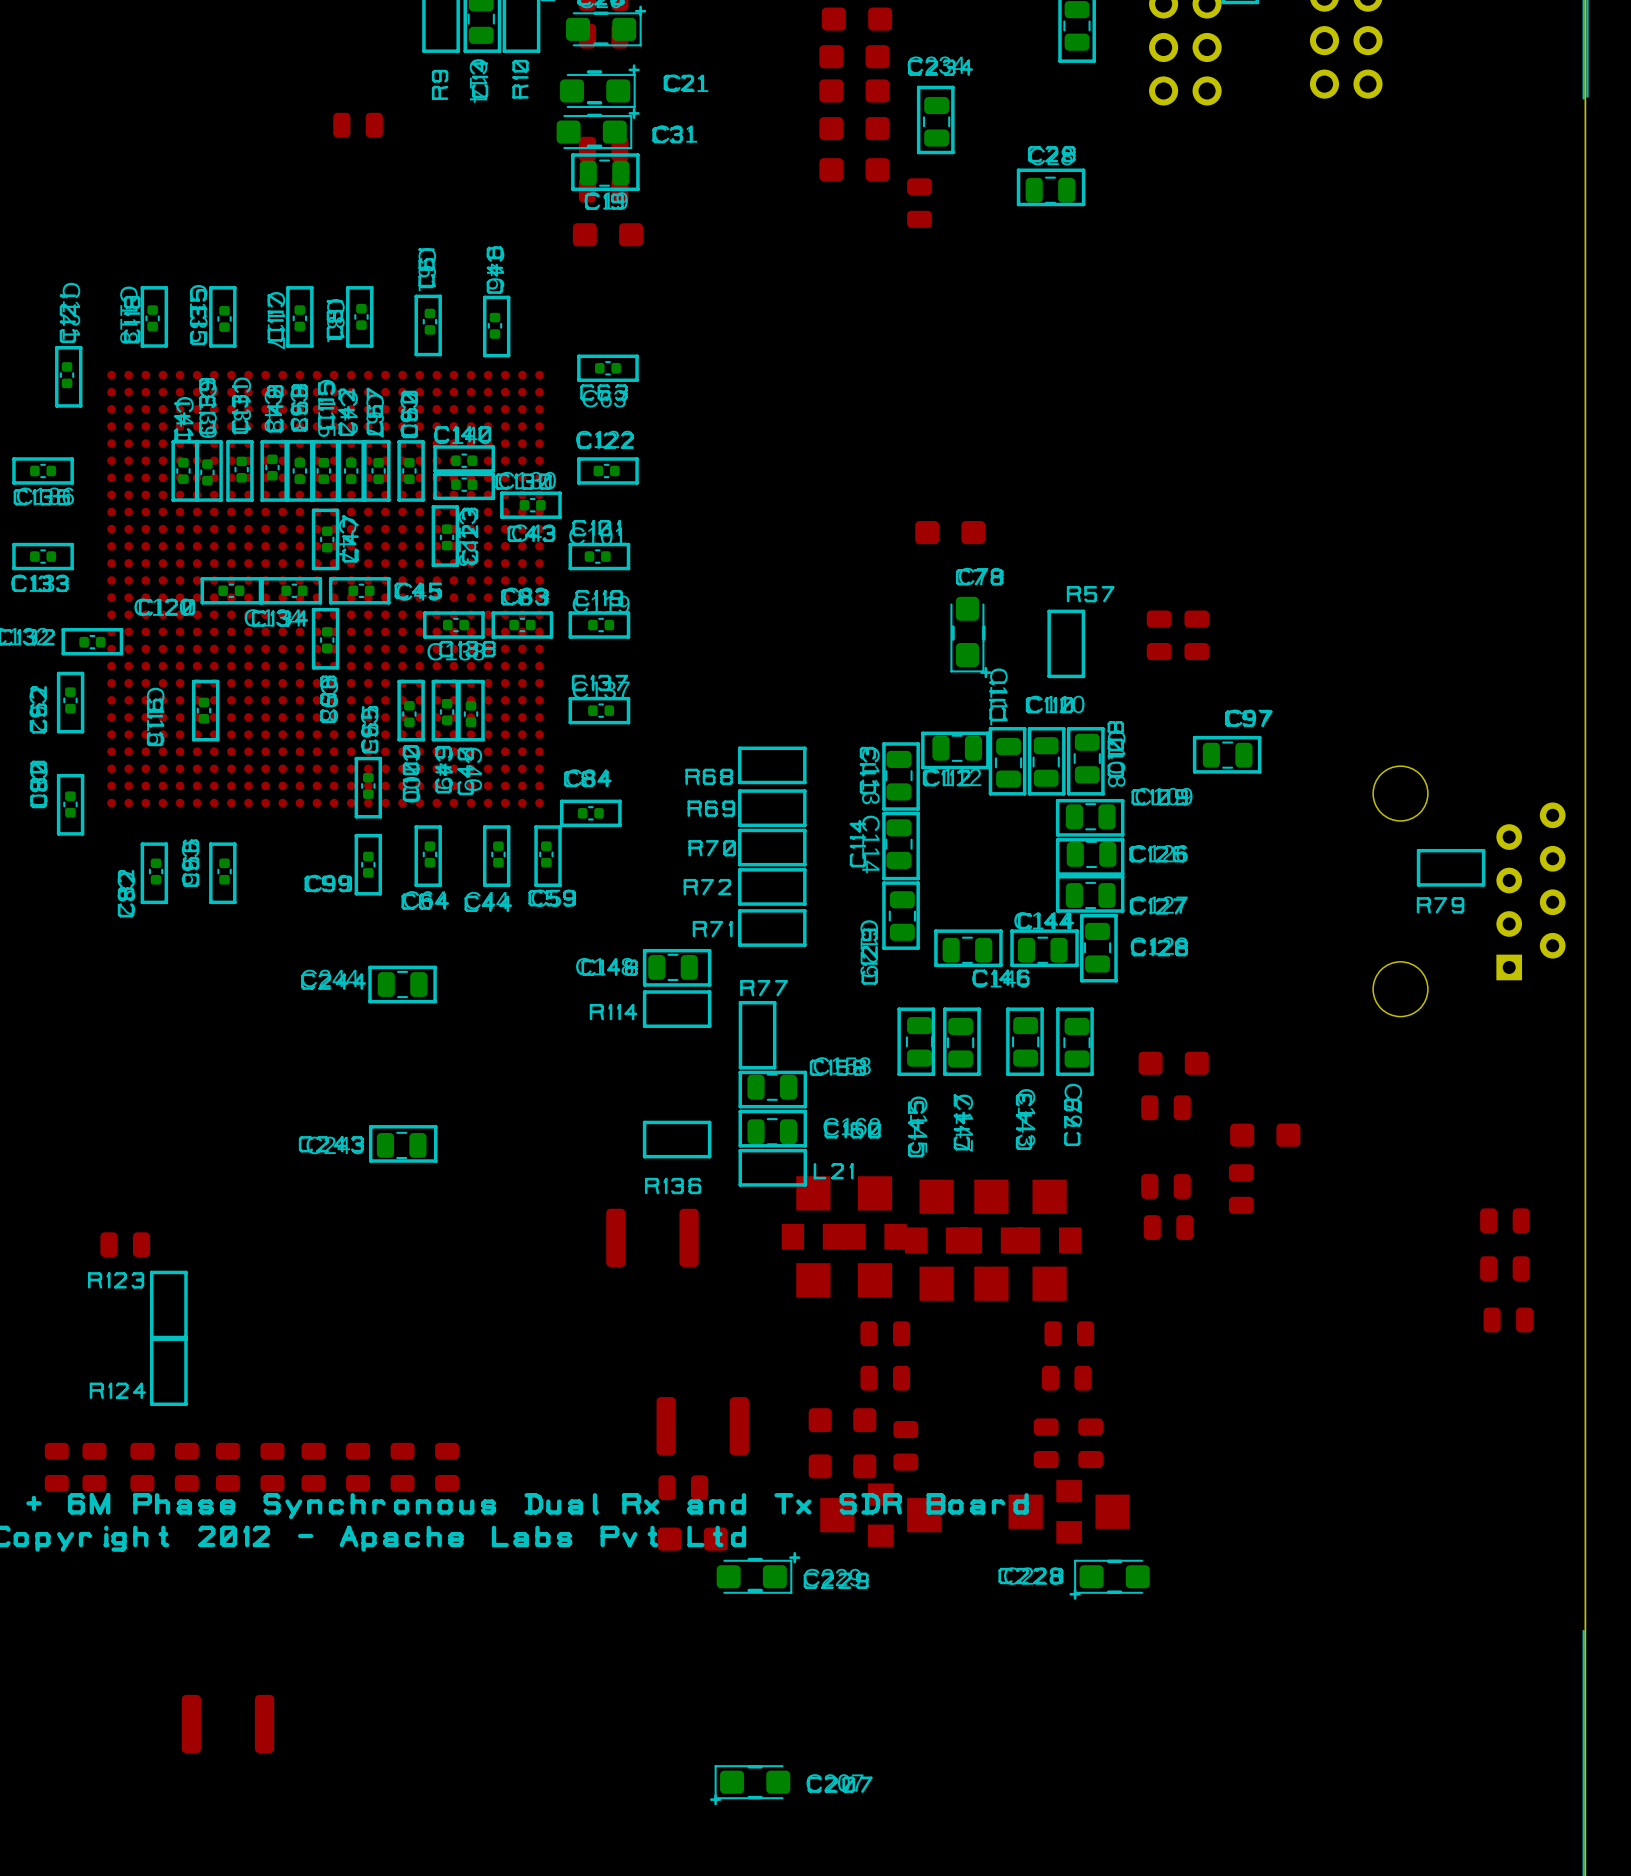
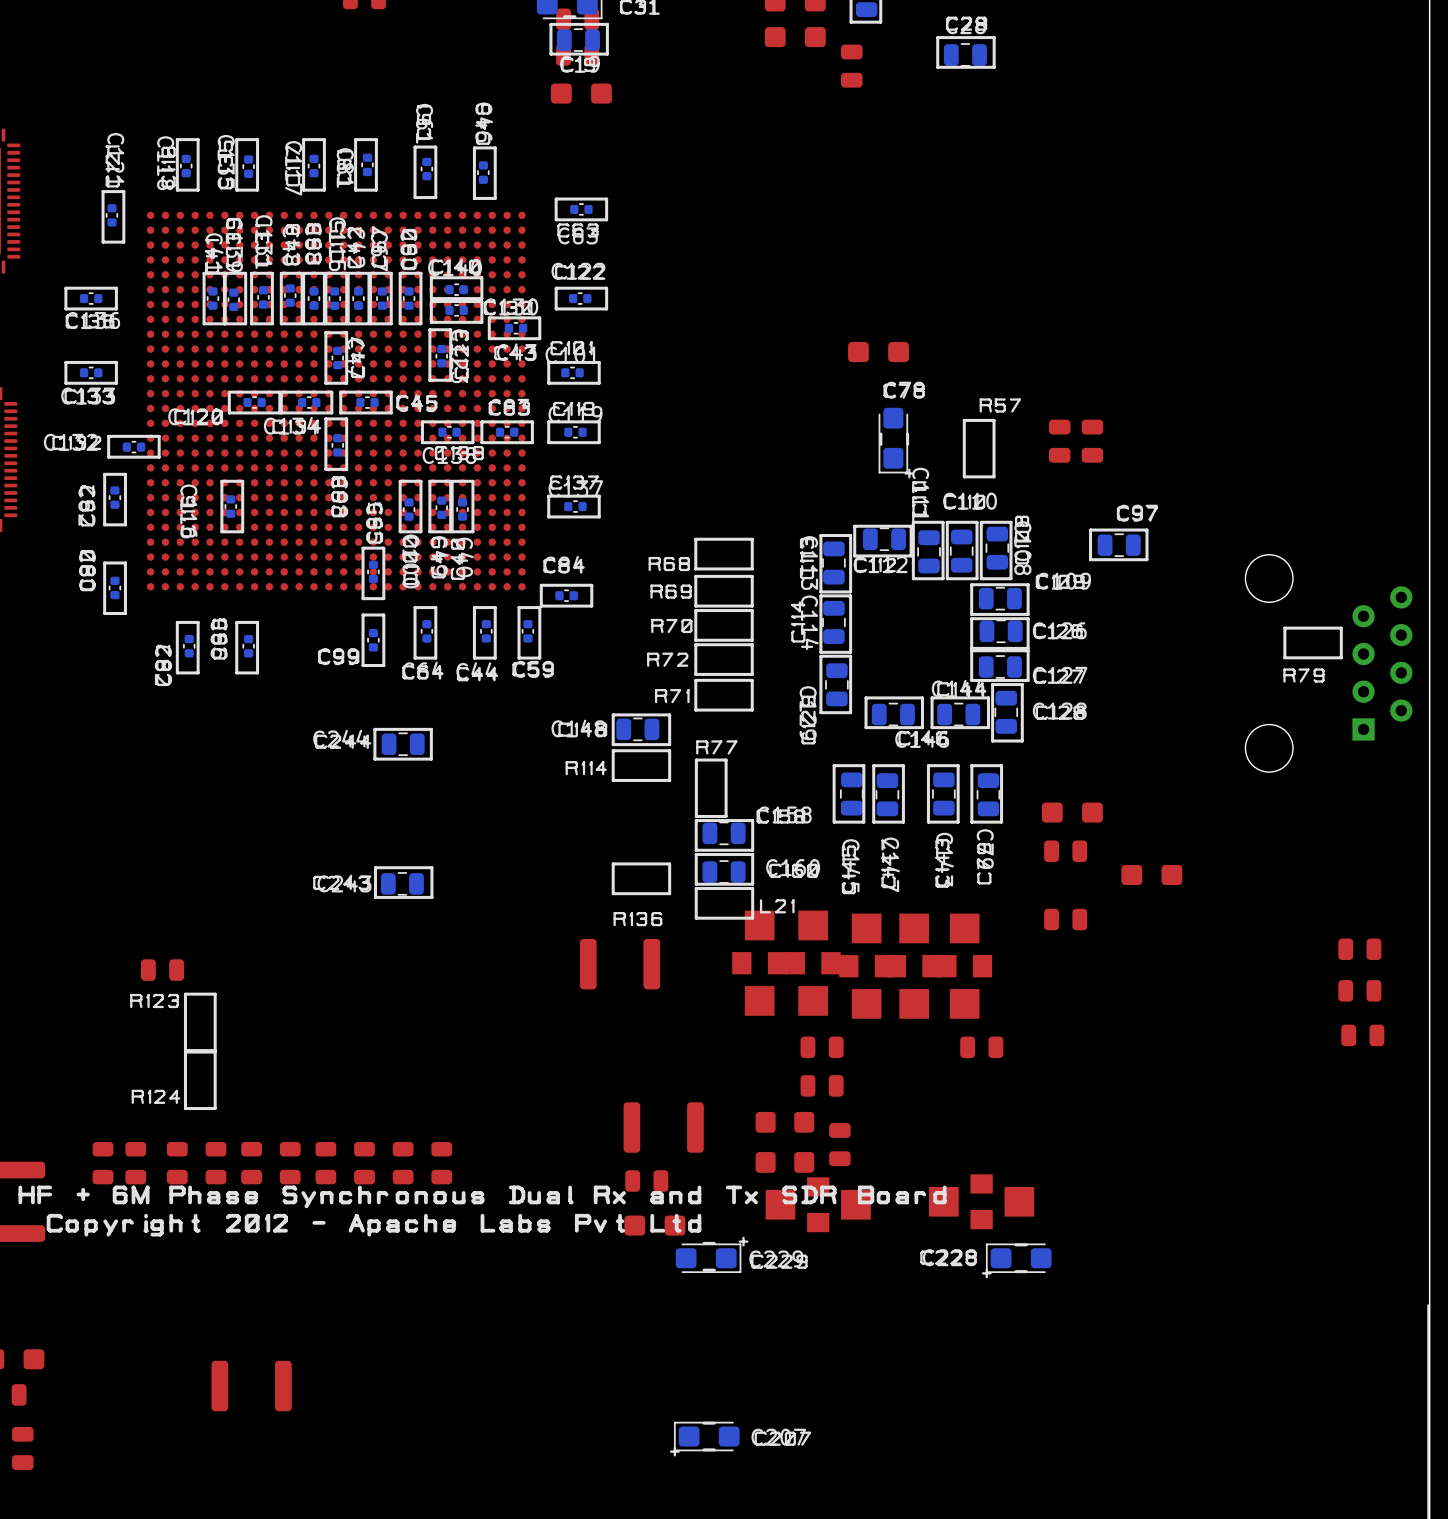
part: (1241, 1189) -> none
part: (1168, 1227) -> none
part: (1066, 1378) -> none
part: (1046, 1443) -> none
part: (1090, 1443) -> none

